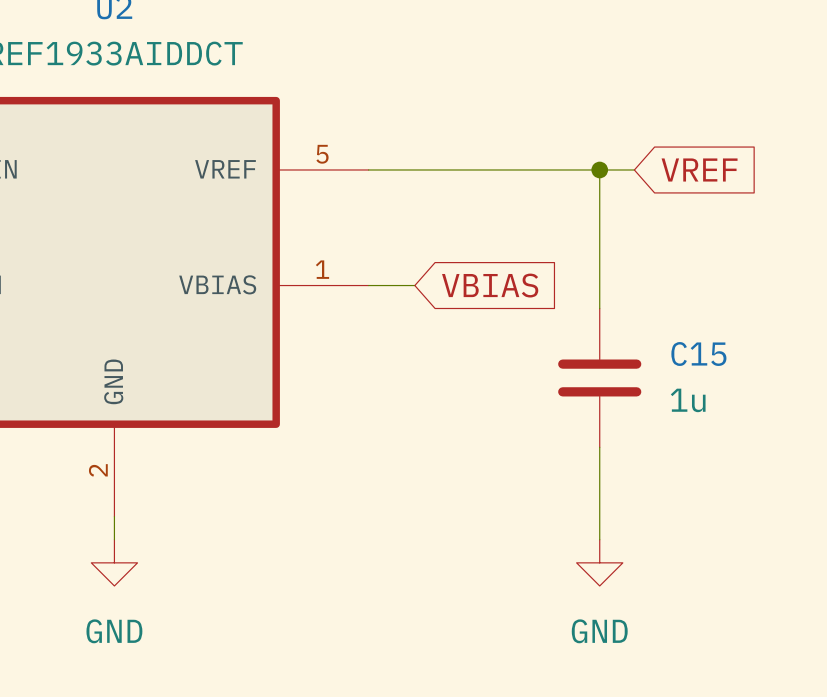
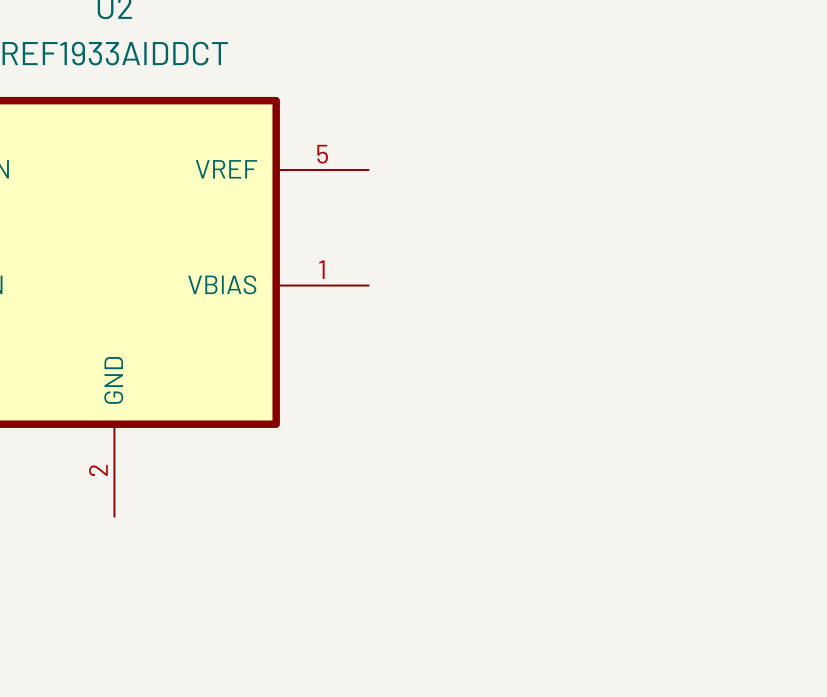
wire: (368, 169) (634, 169) -> none
wire: (599, 169) (599, 308) -> none
junction: (599, 169) -> none
global label: VREF (699, 169) -> none
wire: (368, 285) (414, 285) -> none
global label: VBIAS (490, 285) -> none
C15: 1u (599, 377) -> none
wire: (599, 447) (599, 539) -> none
wire: (114, 516) (114, 539) -> none
power symbol: GND (114, 562) -> none
power symbol: GND (599, 562) -> none

